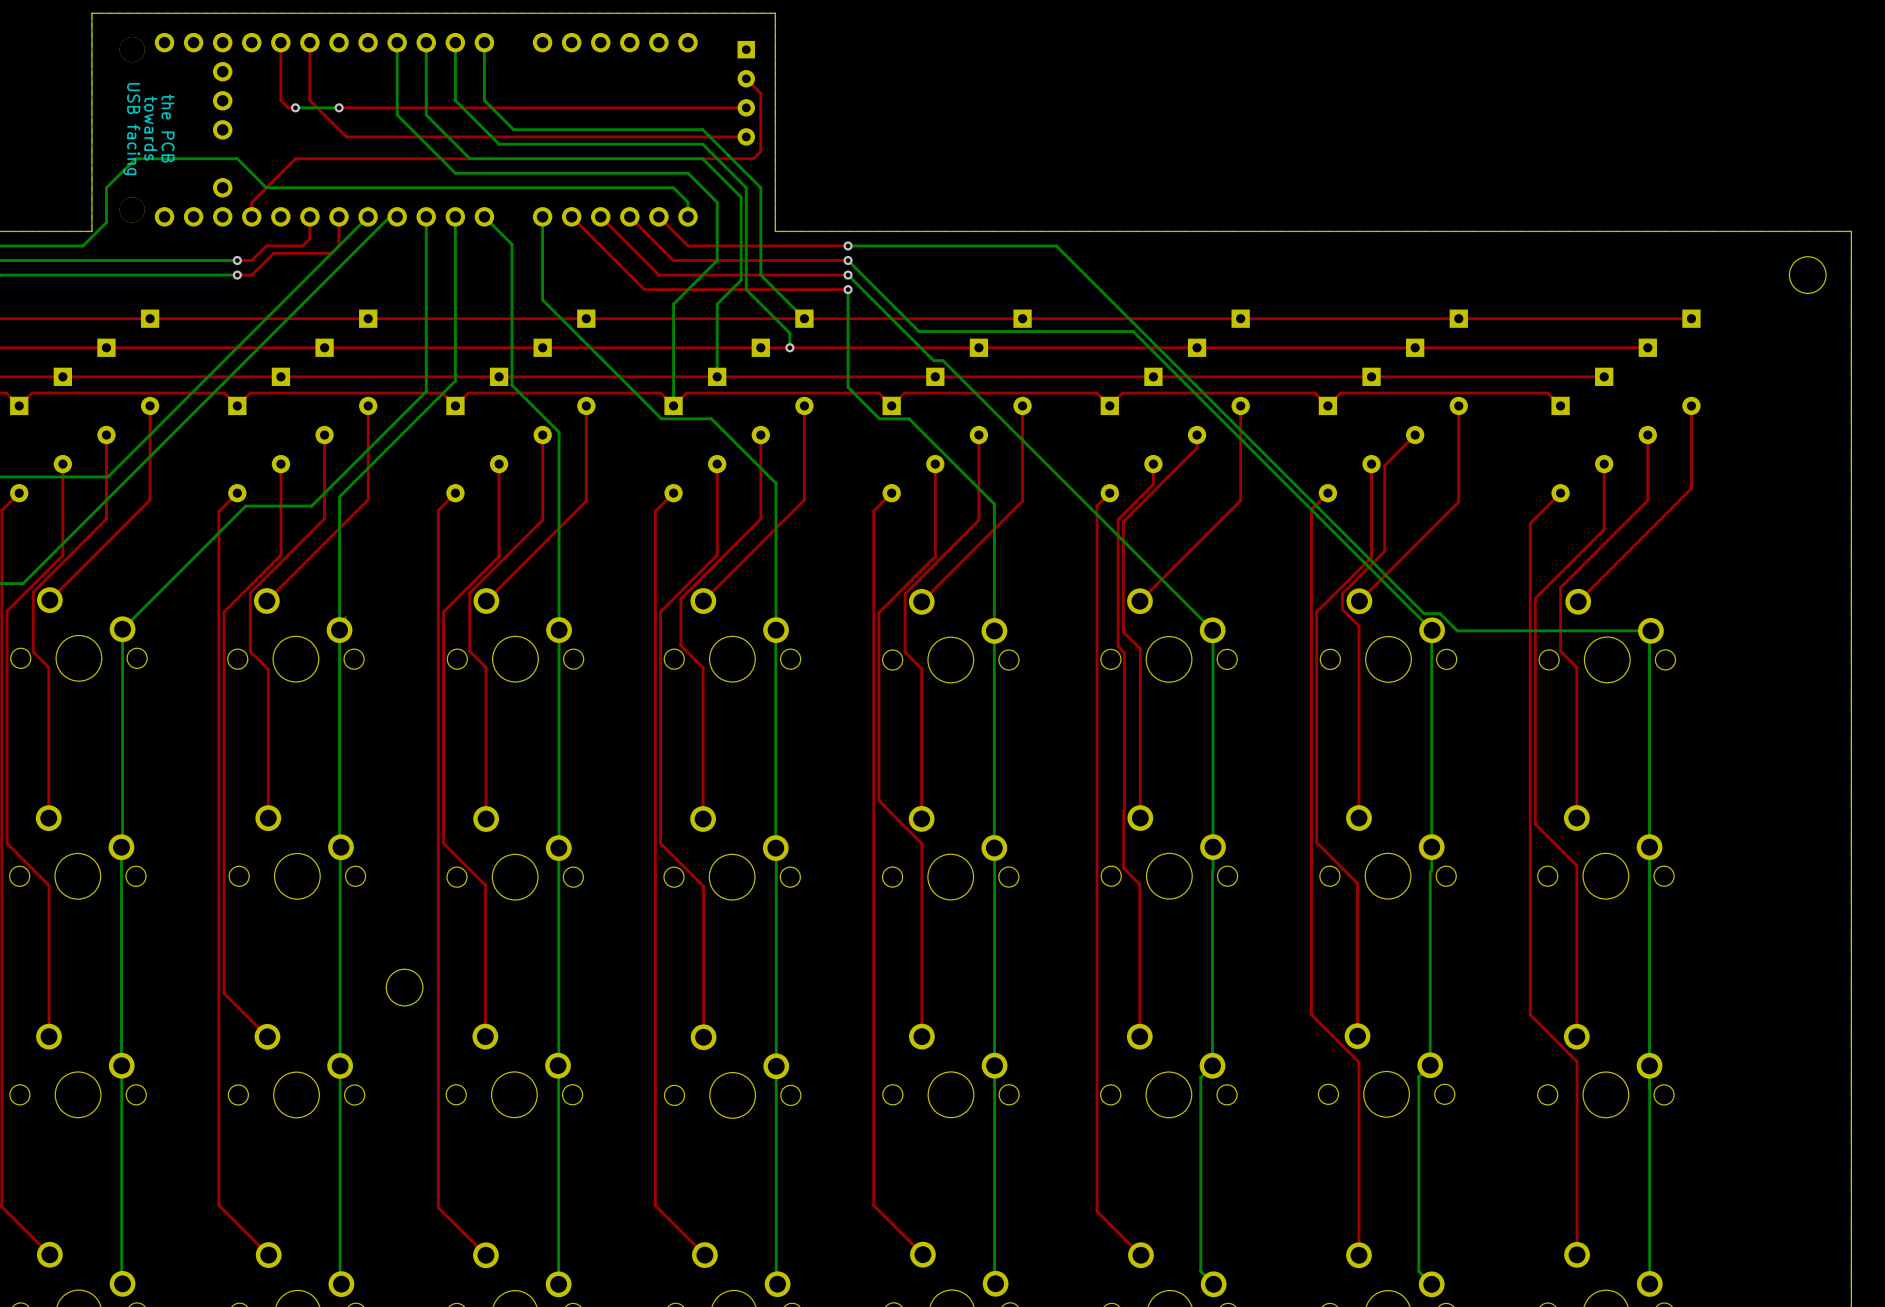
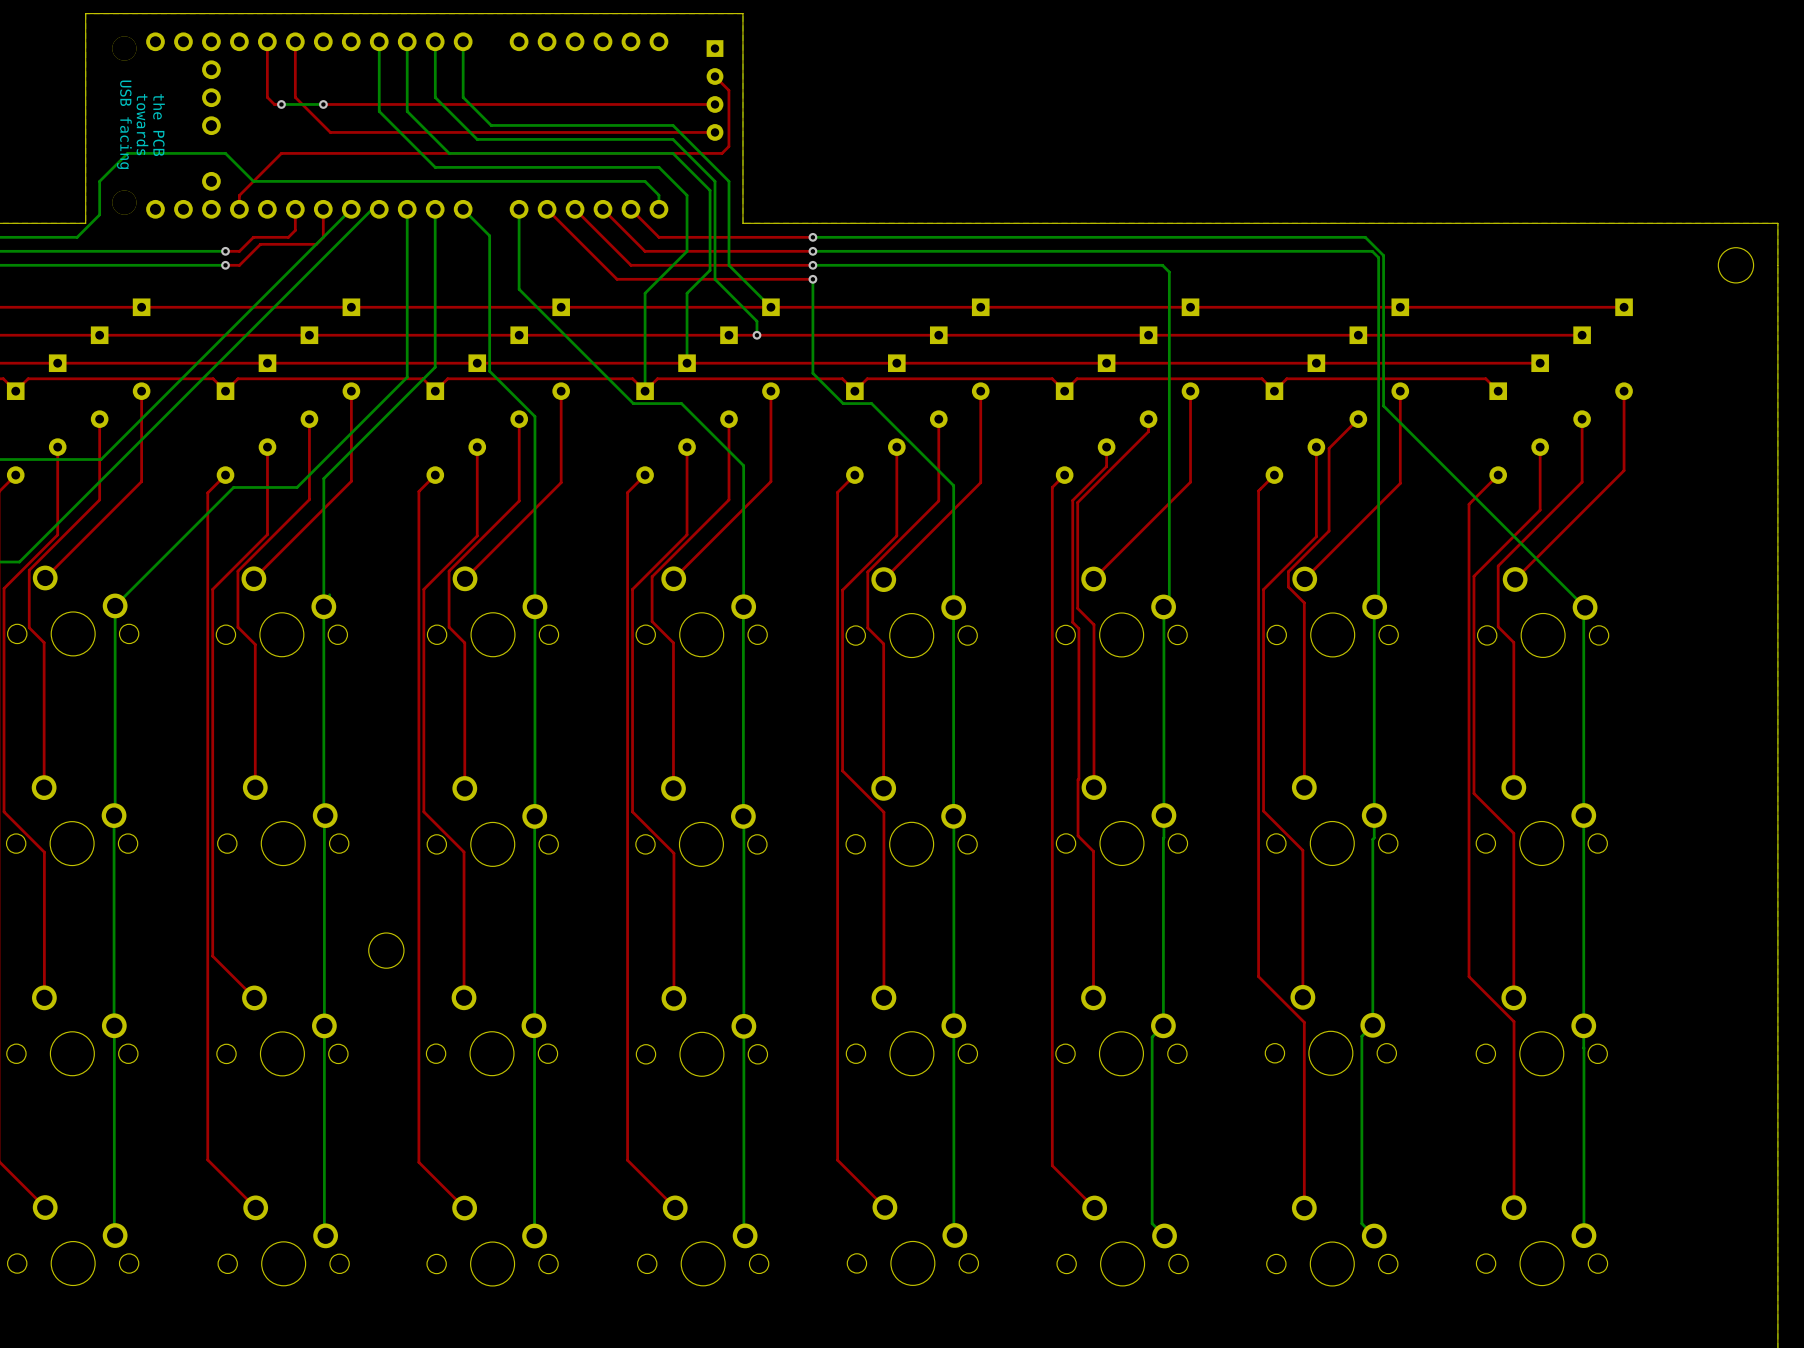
bottom track: (1056, 245) (1424, 613) (1440, 613) (1457, 630) (1650, 630) -> (1013, 237) (1365, 237) (1383, 255) (1383, 405) (1585, 607)
bottom track: (848, 260) (919, 331) (1133, 331) (1432, 630) -> (812, 251) (1372, 251) (1378, 257) (1378, 615)
bottom track: (848, 275) (933, 360) (943, 360) (1212, 630) -> (812, 265) (1162, 265) (1169, 272) (1169, 615)

